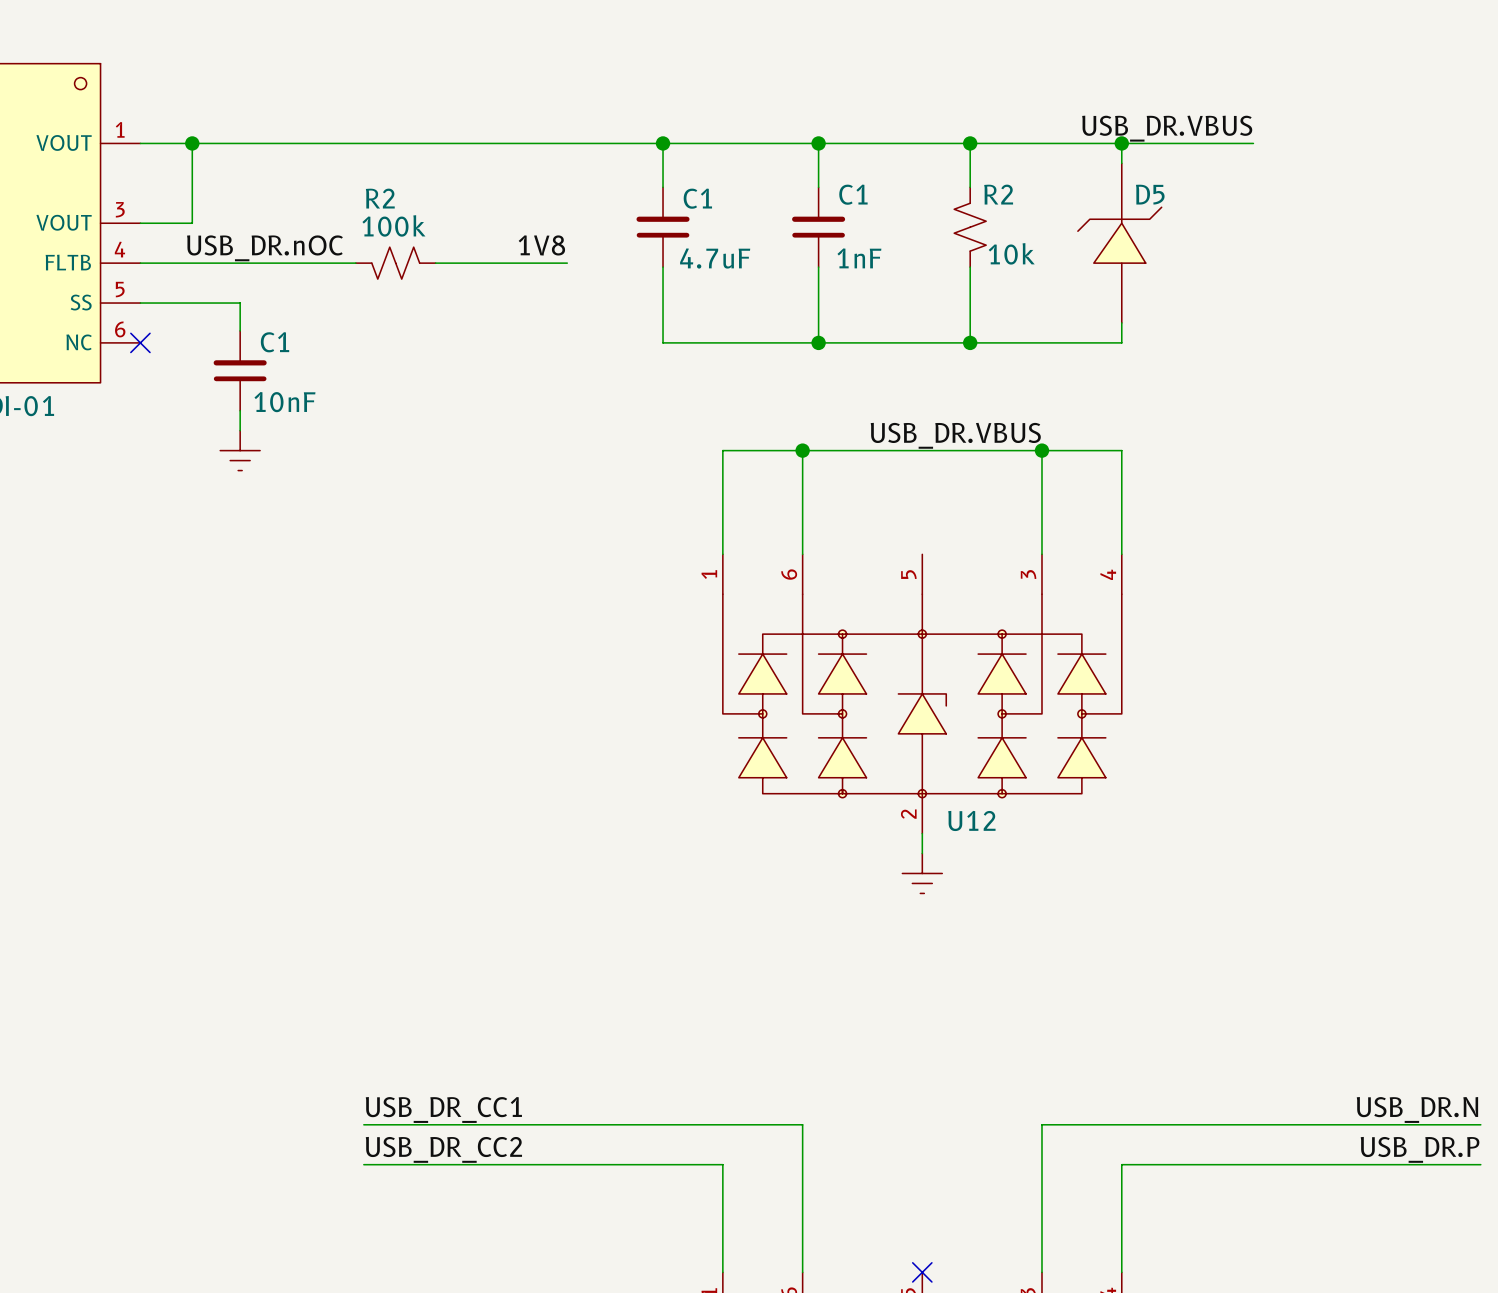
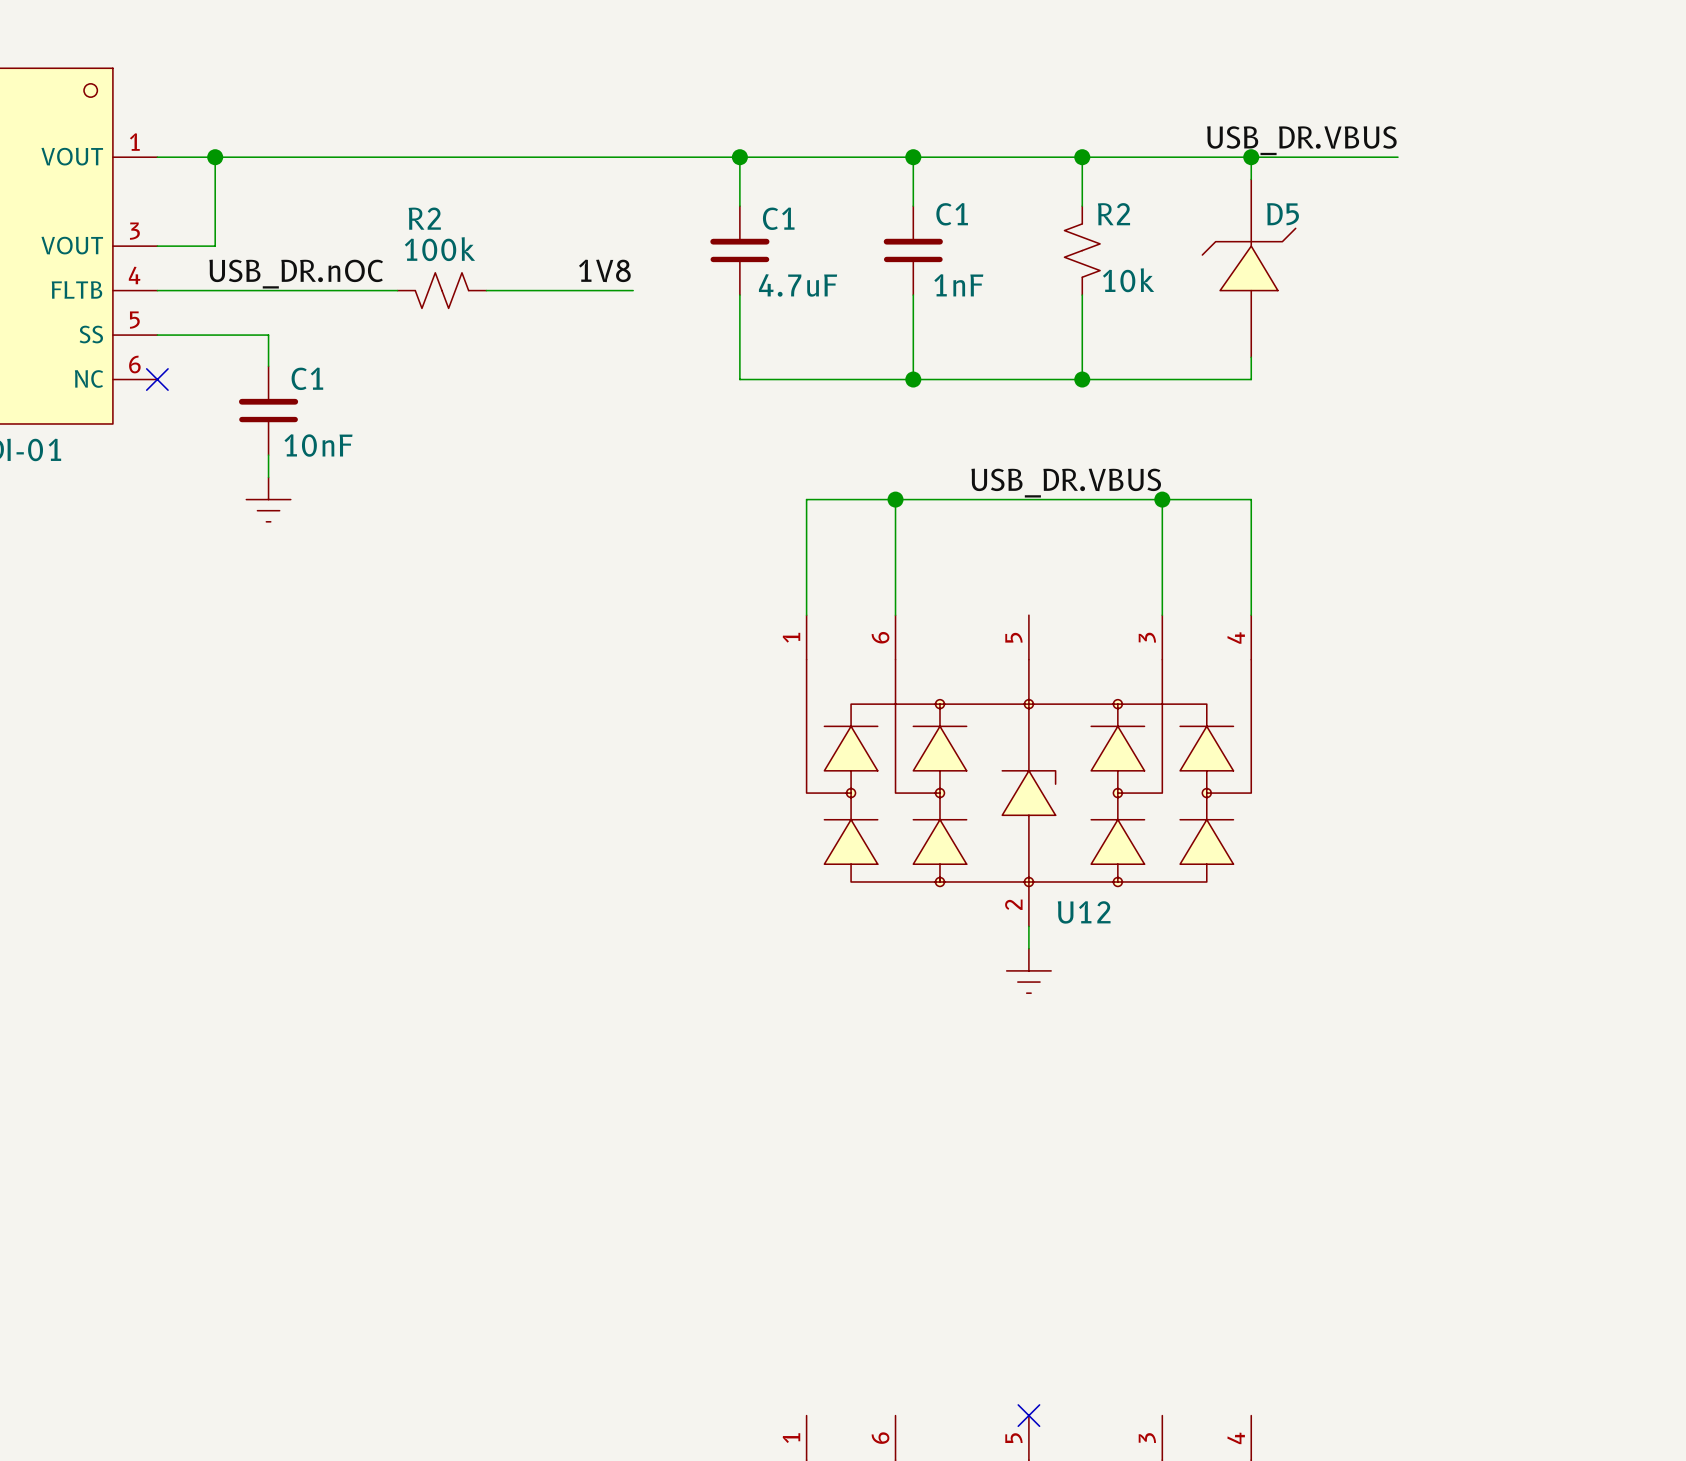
label: USB_DR_CC1 (443, 1109) -> none
label: USB_DR.N (1417, 1109) -> none
wire: (363, 1124) (802, 1124) (802, 1272) -> none
wire: (1480, 1124) (1041, 1124) (1041, 1272) -> none
label: USB_DR_CC2 (443, 1149) -> none
label: USB_DR.P (1420, 1149) -> none
wire: (363, 1164) (722, 1164) (722, 1272) -> none
wire: (1480, 1164) (1121, 1164) (1121, 1272) -> none

